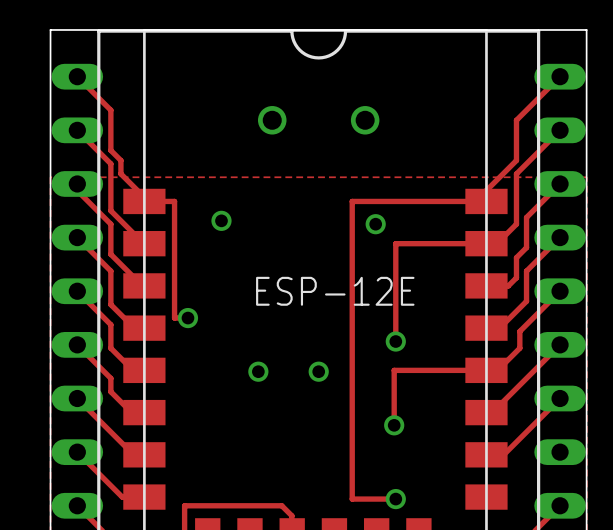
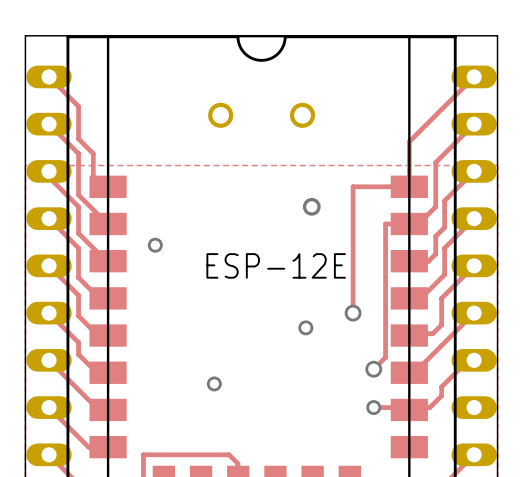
track: (516, 120) (516, 160) (486, 190) -> (435, 115) (409, 141) (409, 177)
track: (110, 147) (110, 150) (120, 160) (120, 173) (144, 197) (144, 201) (174, 201) (174, 318) (187, 318) -> (78, 138) (93, 153) (93, 177) (108, 186)
track: (422, 201) (352, 201) (352, 499) (395, 499) -> (353, 186) (353, 313)
via: (221, 220) -> none
track: (459, 243) (395, 243) (395, 341) -> (385, 223) (385, 357) (373, 369)
via: none -> (155, 245)
via: (187, 318) -> none
track: (523, 328) (519, 331) (519, 348) (497, 370) (394, 370) (394, 425) -> (441, 298) (441, 324) (432, 333) (411, 333) (409, 335)
via: (395, 341) -> none
via: none -> (353, 313)
via: none -> (305, 327)
via: (258, 371) -> none
via: (318, 371) -> none
track: (560, 398) (503, 454) (486, 454) -> (474, 360) (468, 360) (441, 386) (441, 395) (429, 407) (373, 407)
via: none -> (373, 369)
via: none -> (214, 383)
via: (394, 425) -> none
via: none -> (373, 407)
via: (395, 499) -> none

